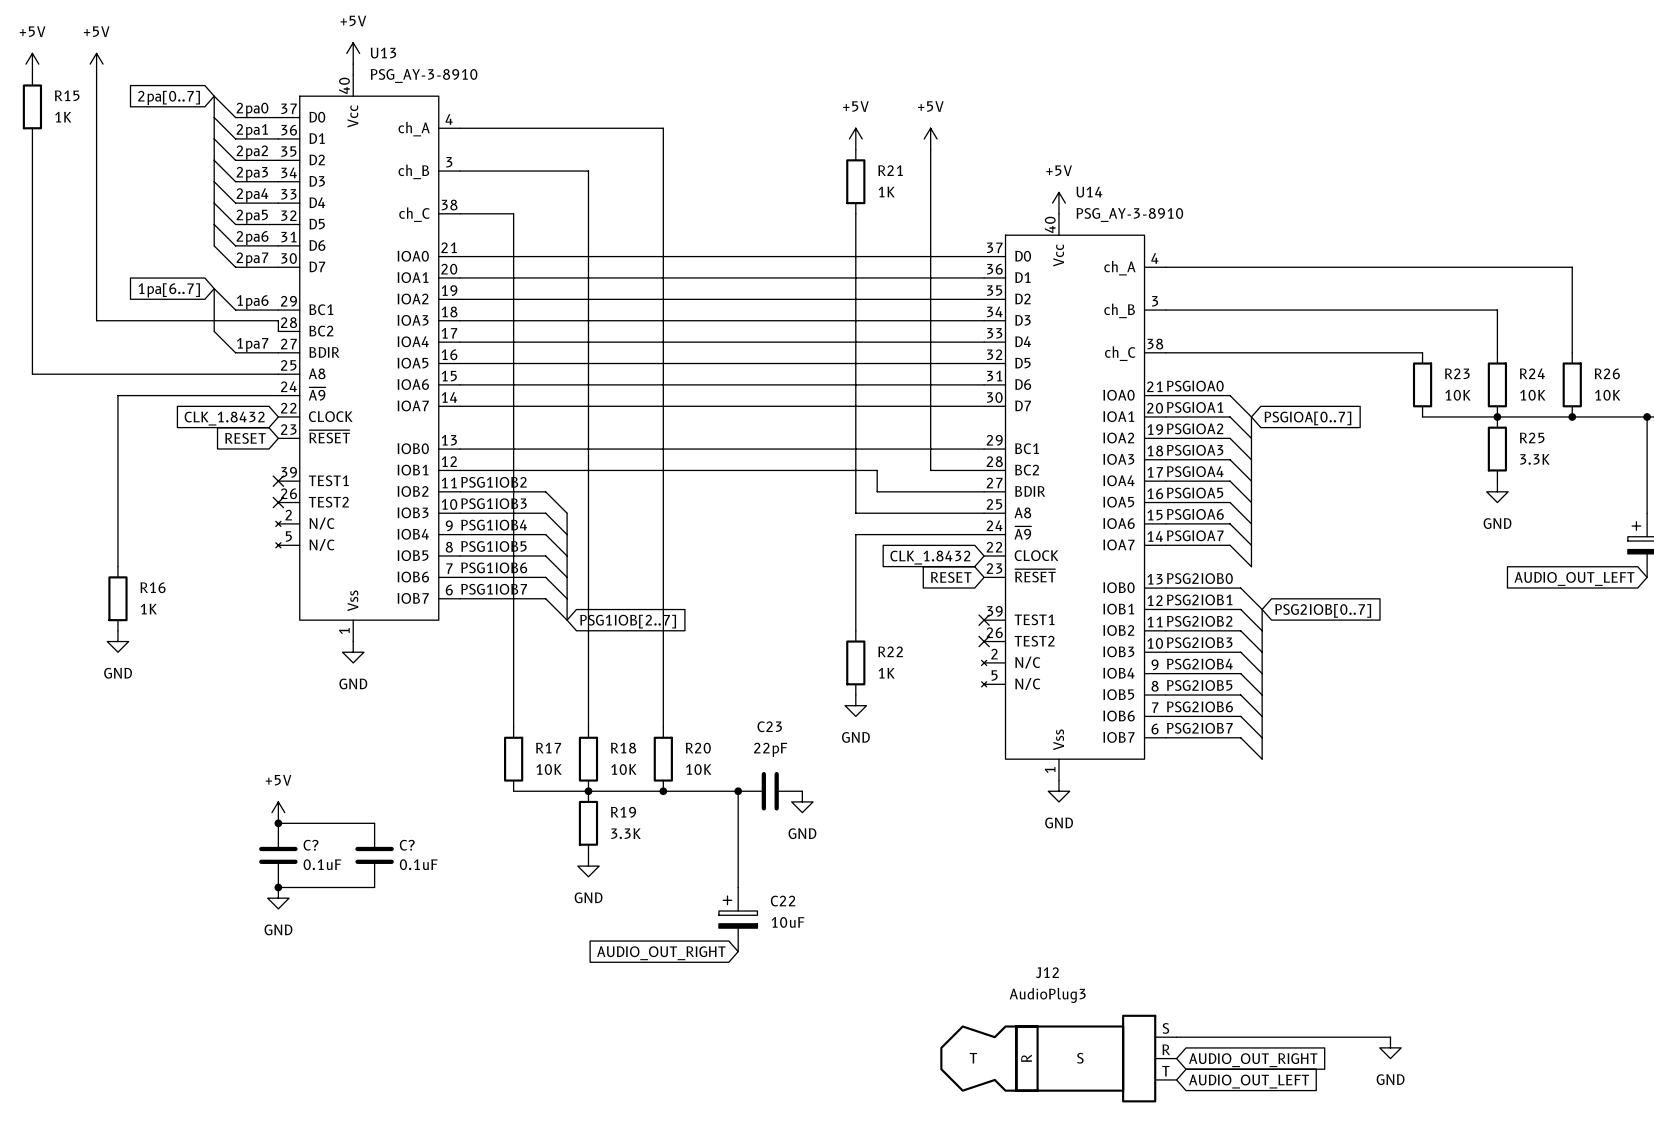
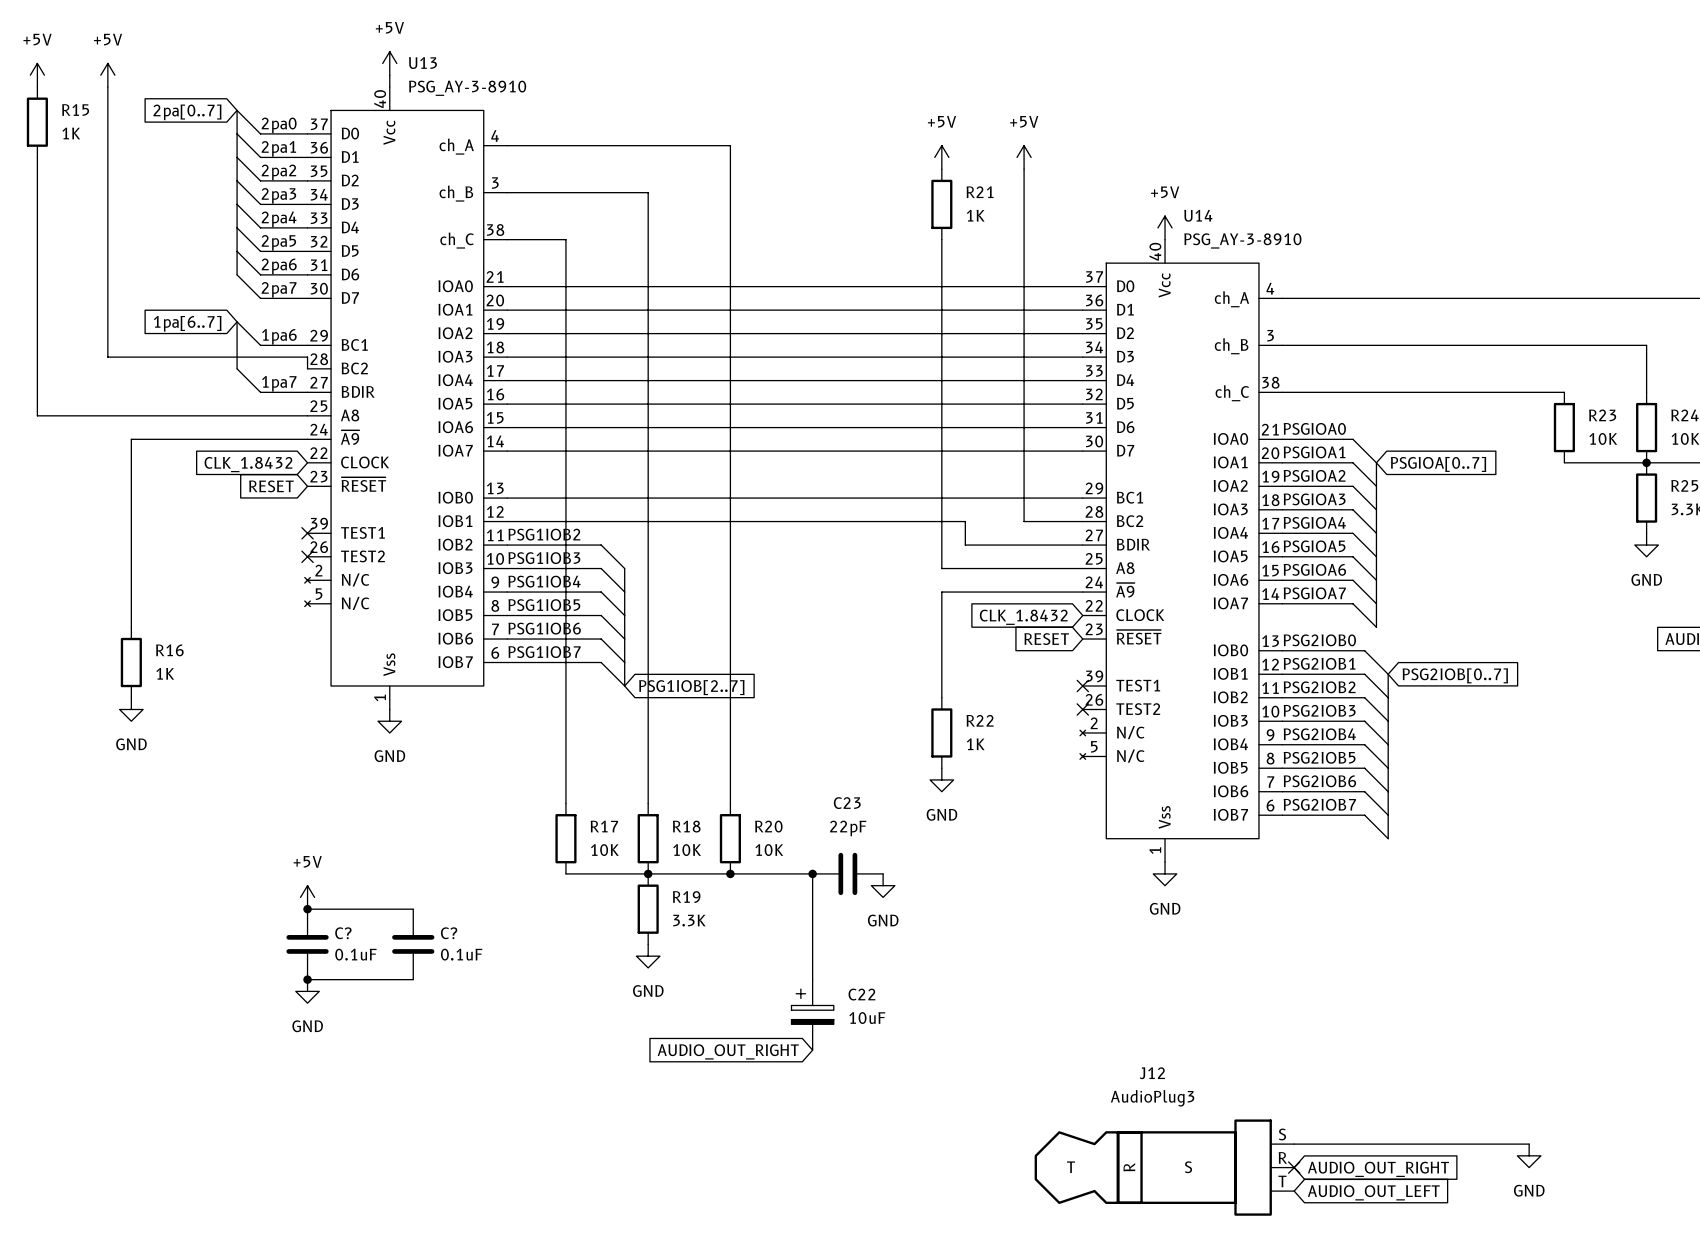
no-connect mark: none -> (1294, 1167)

